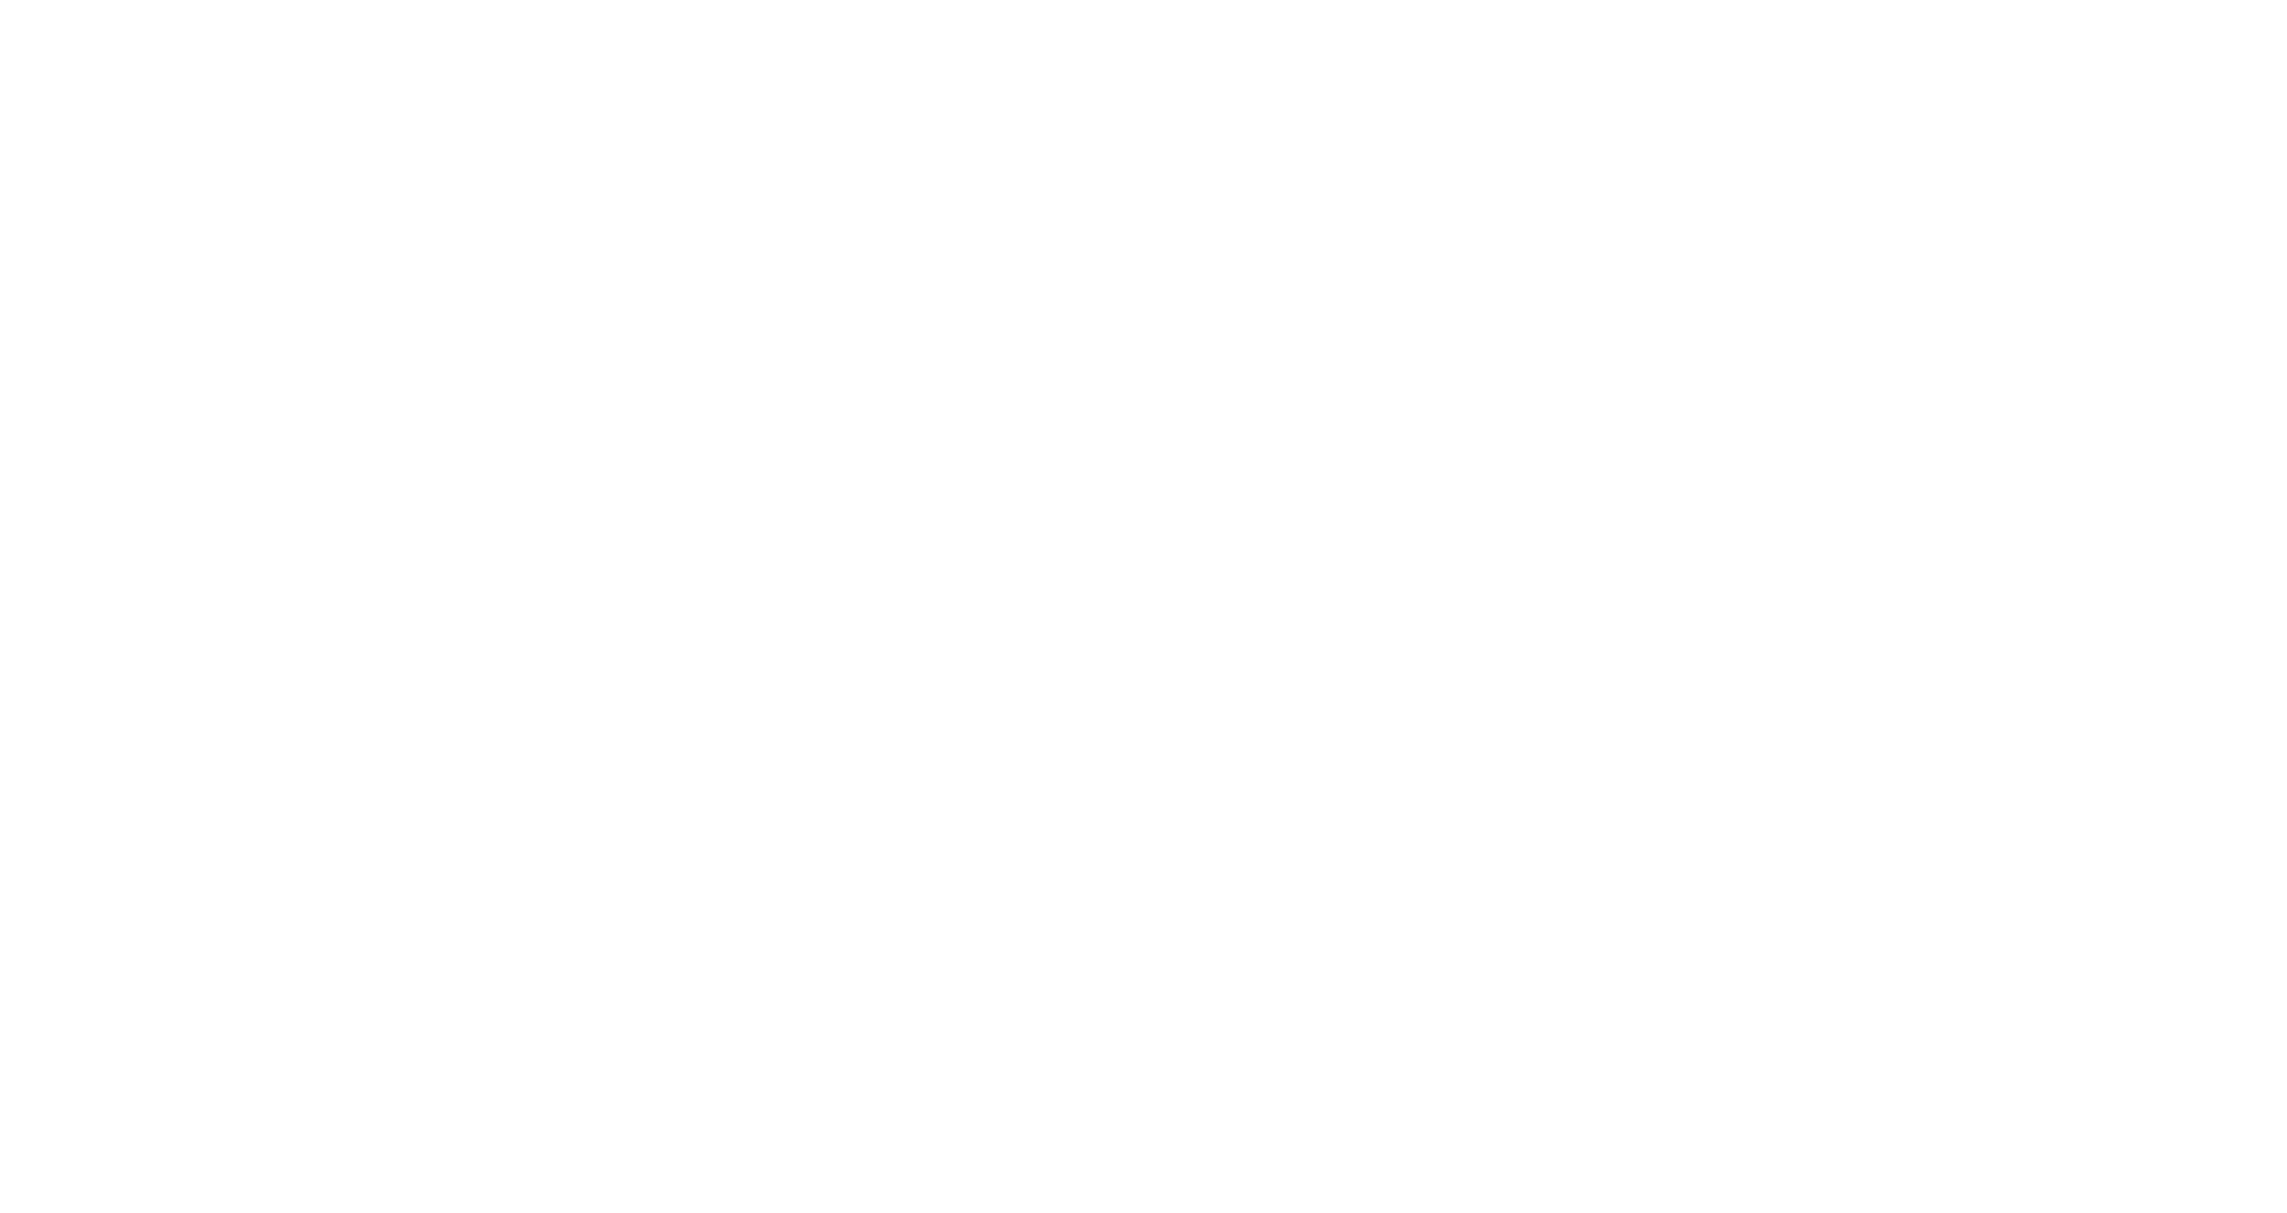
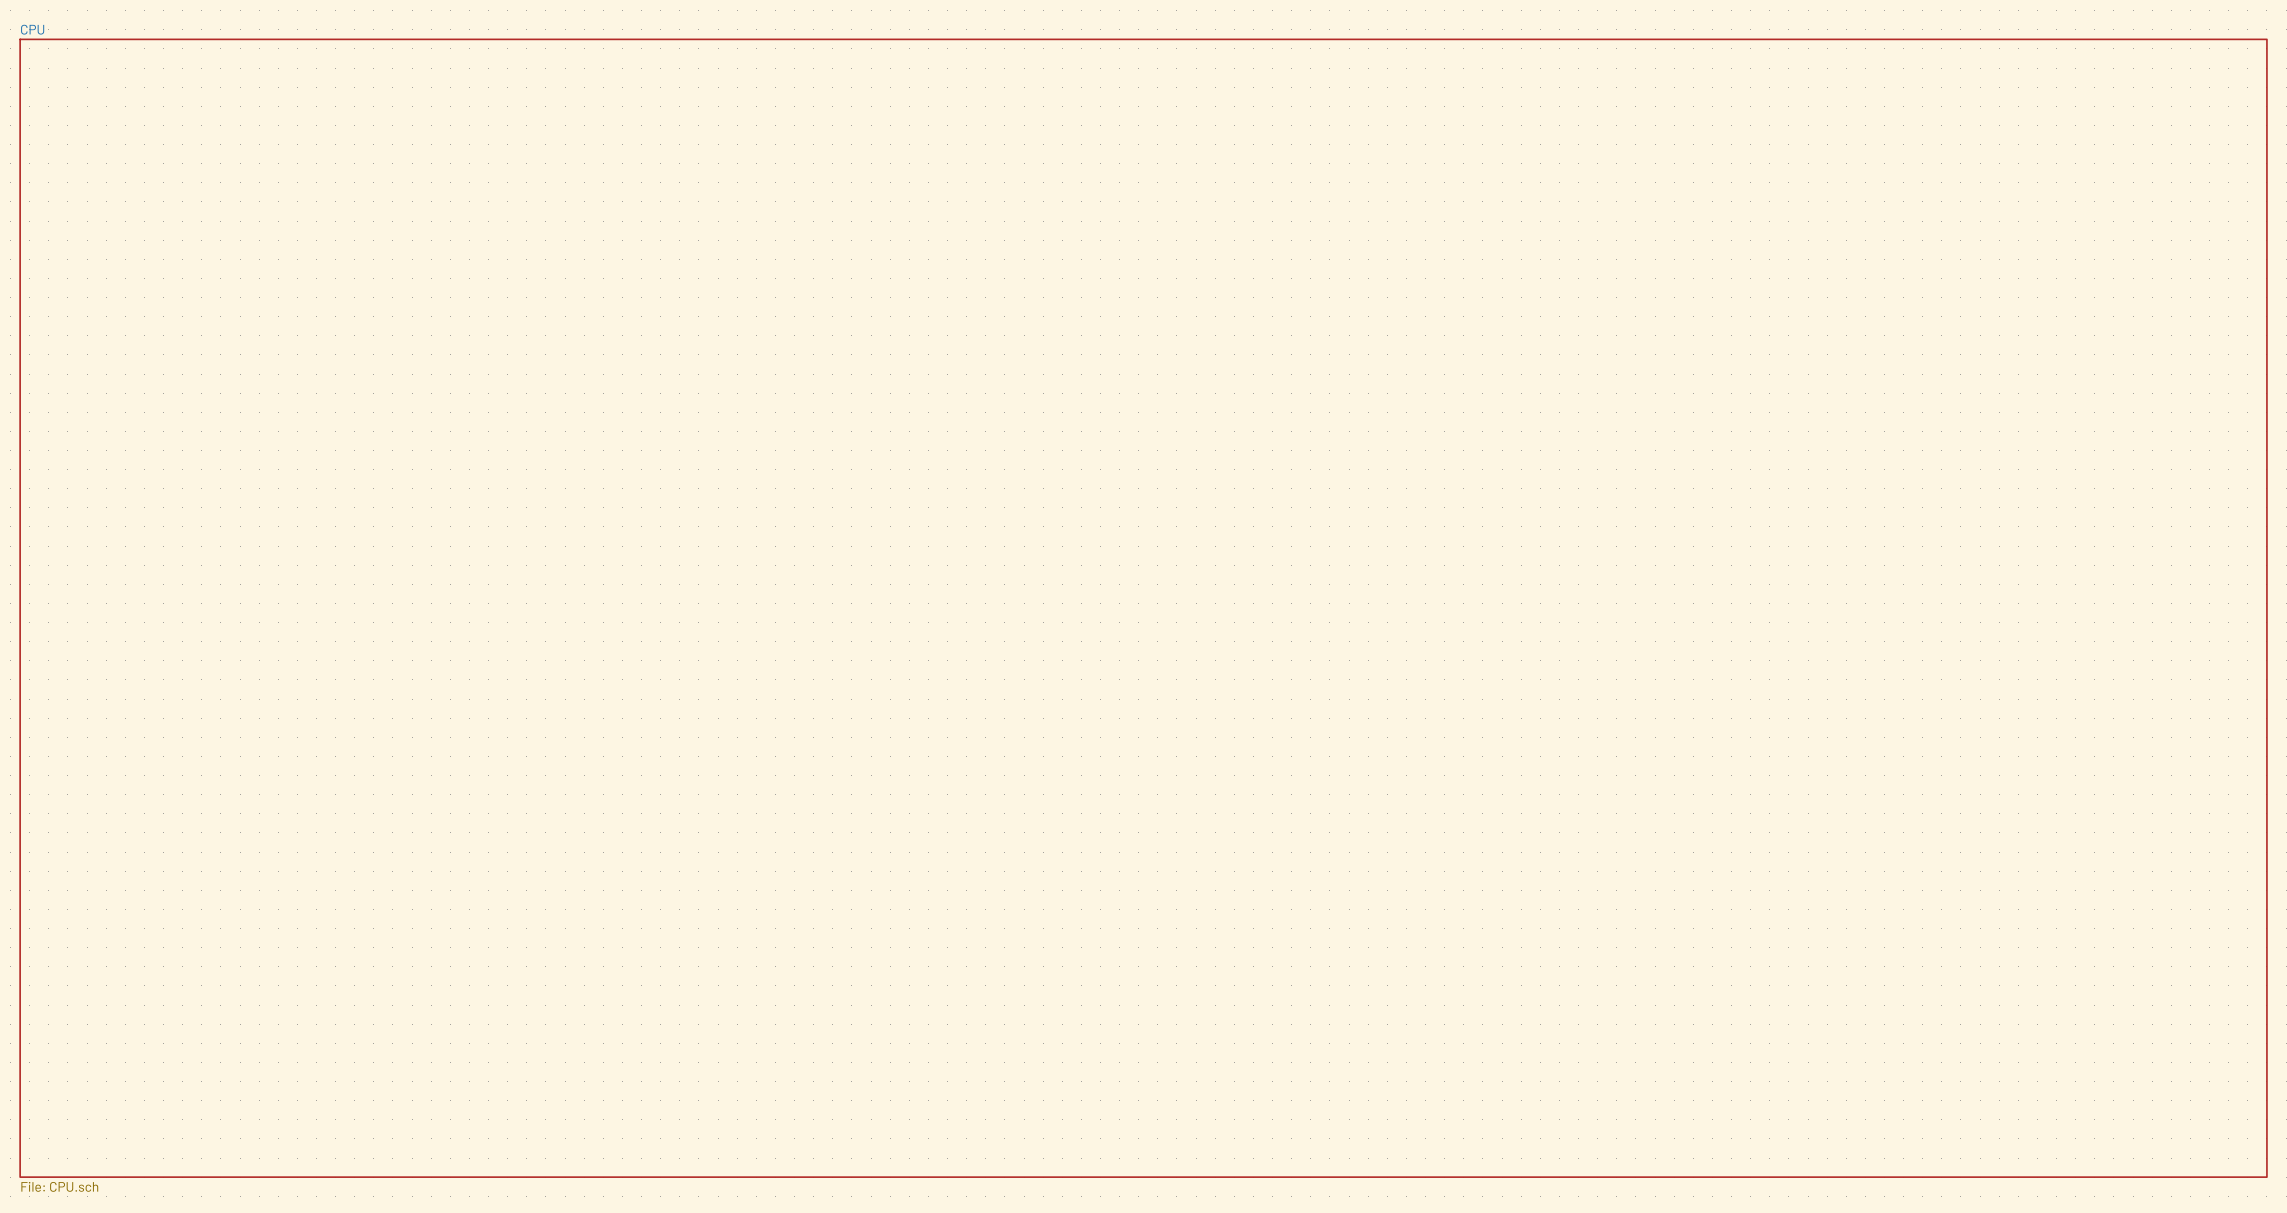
sheet CPU: none -> File: CPU.sch (1143, 608)

